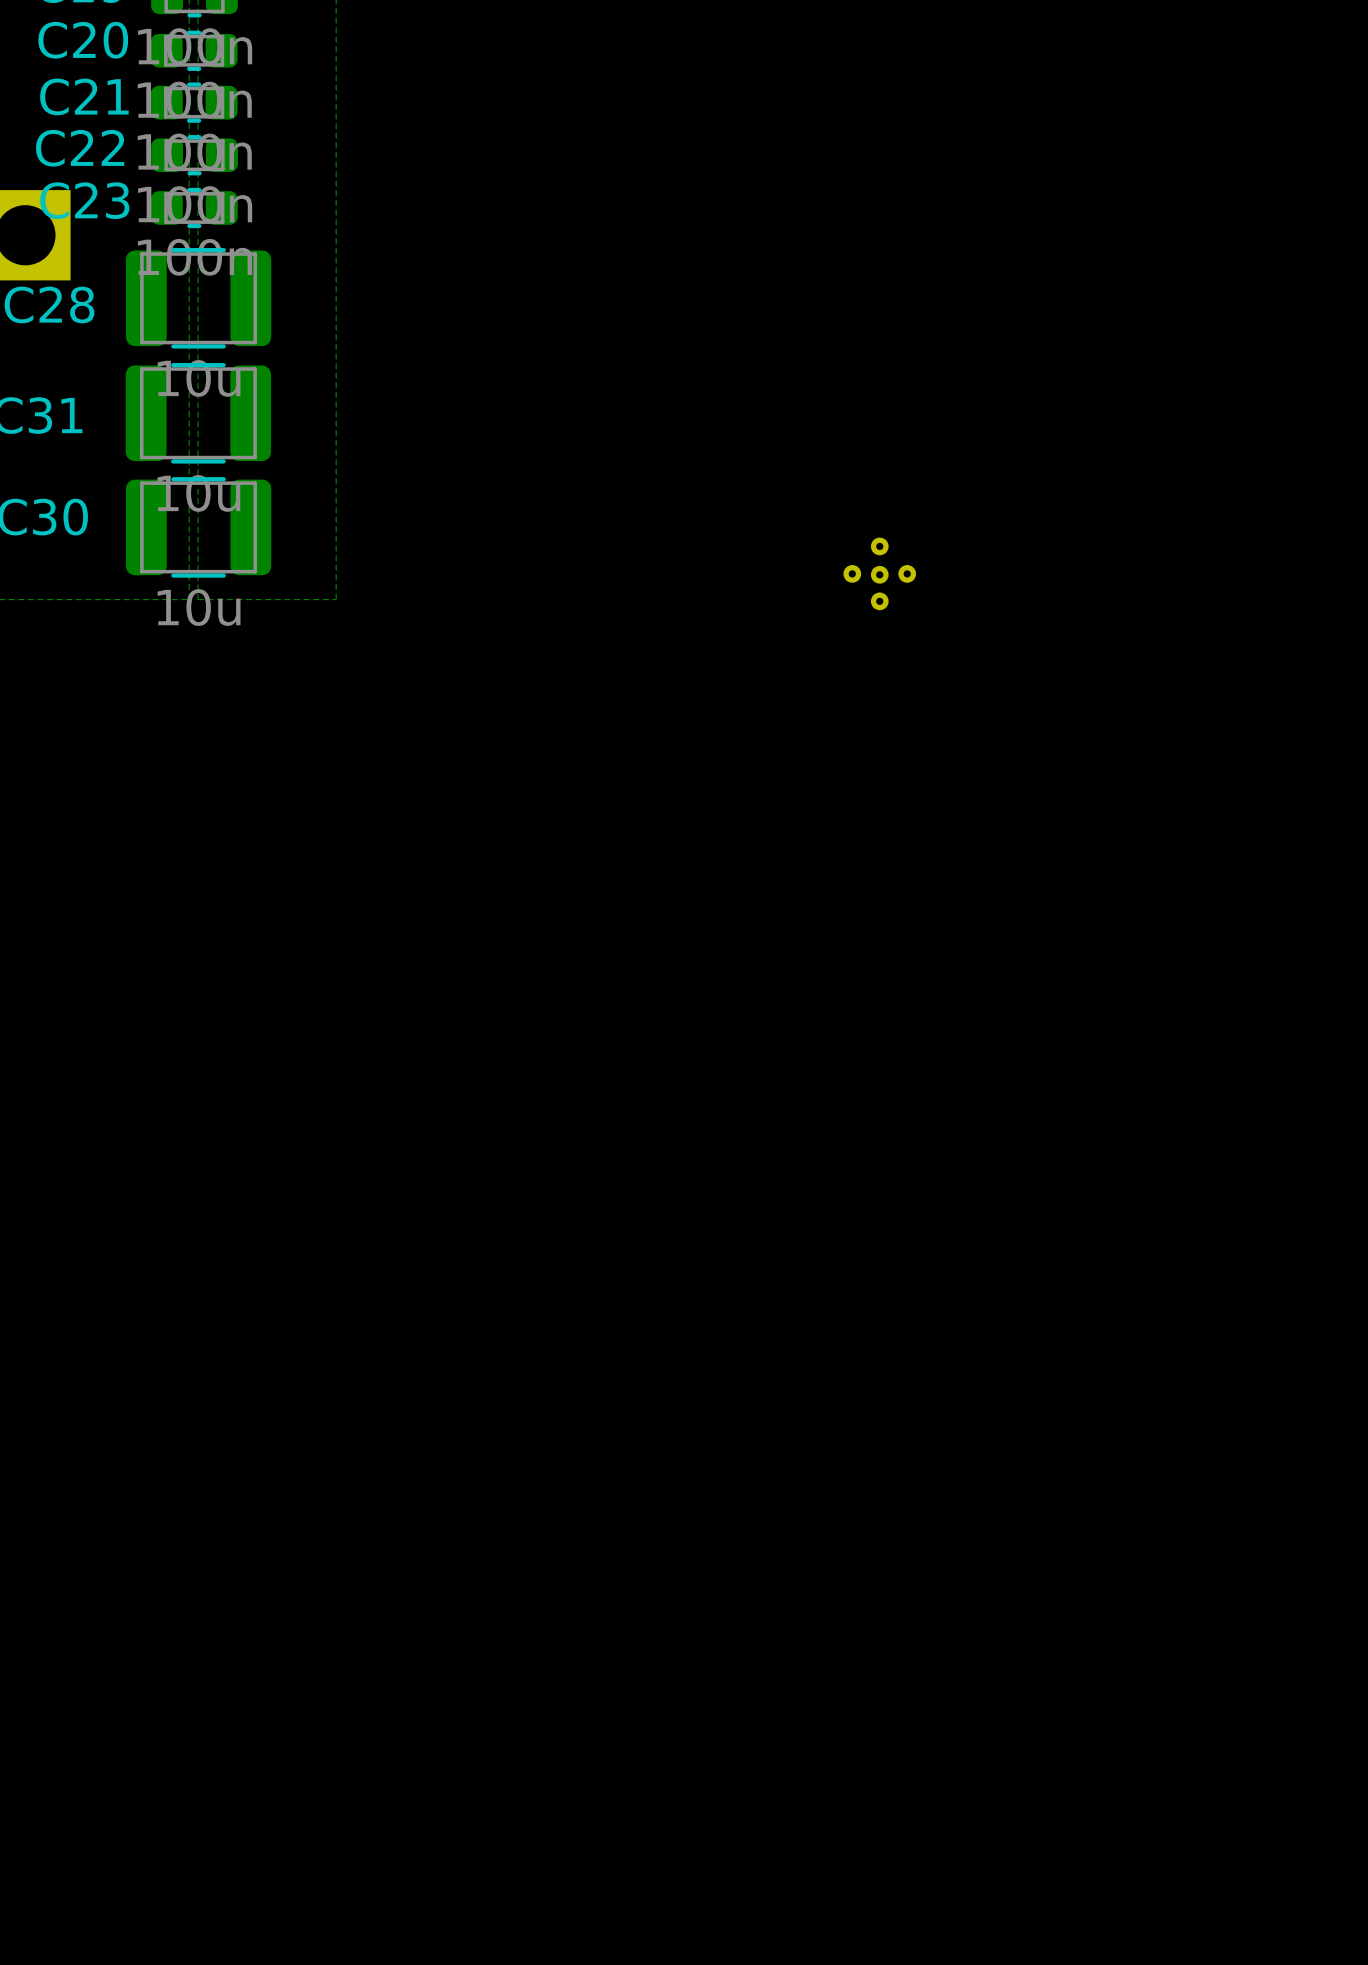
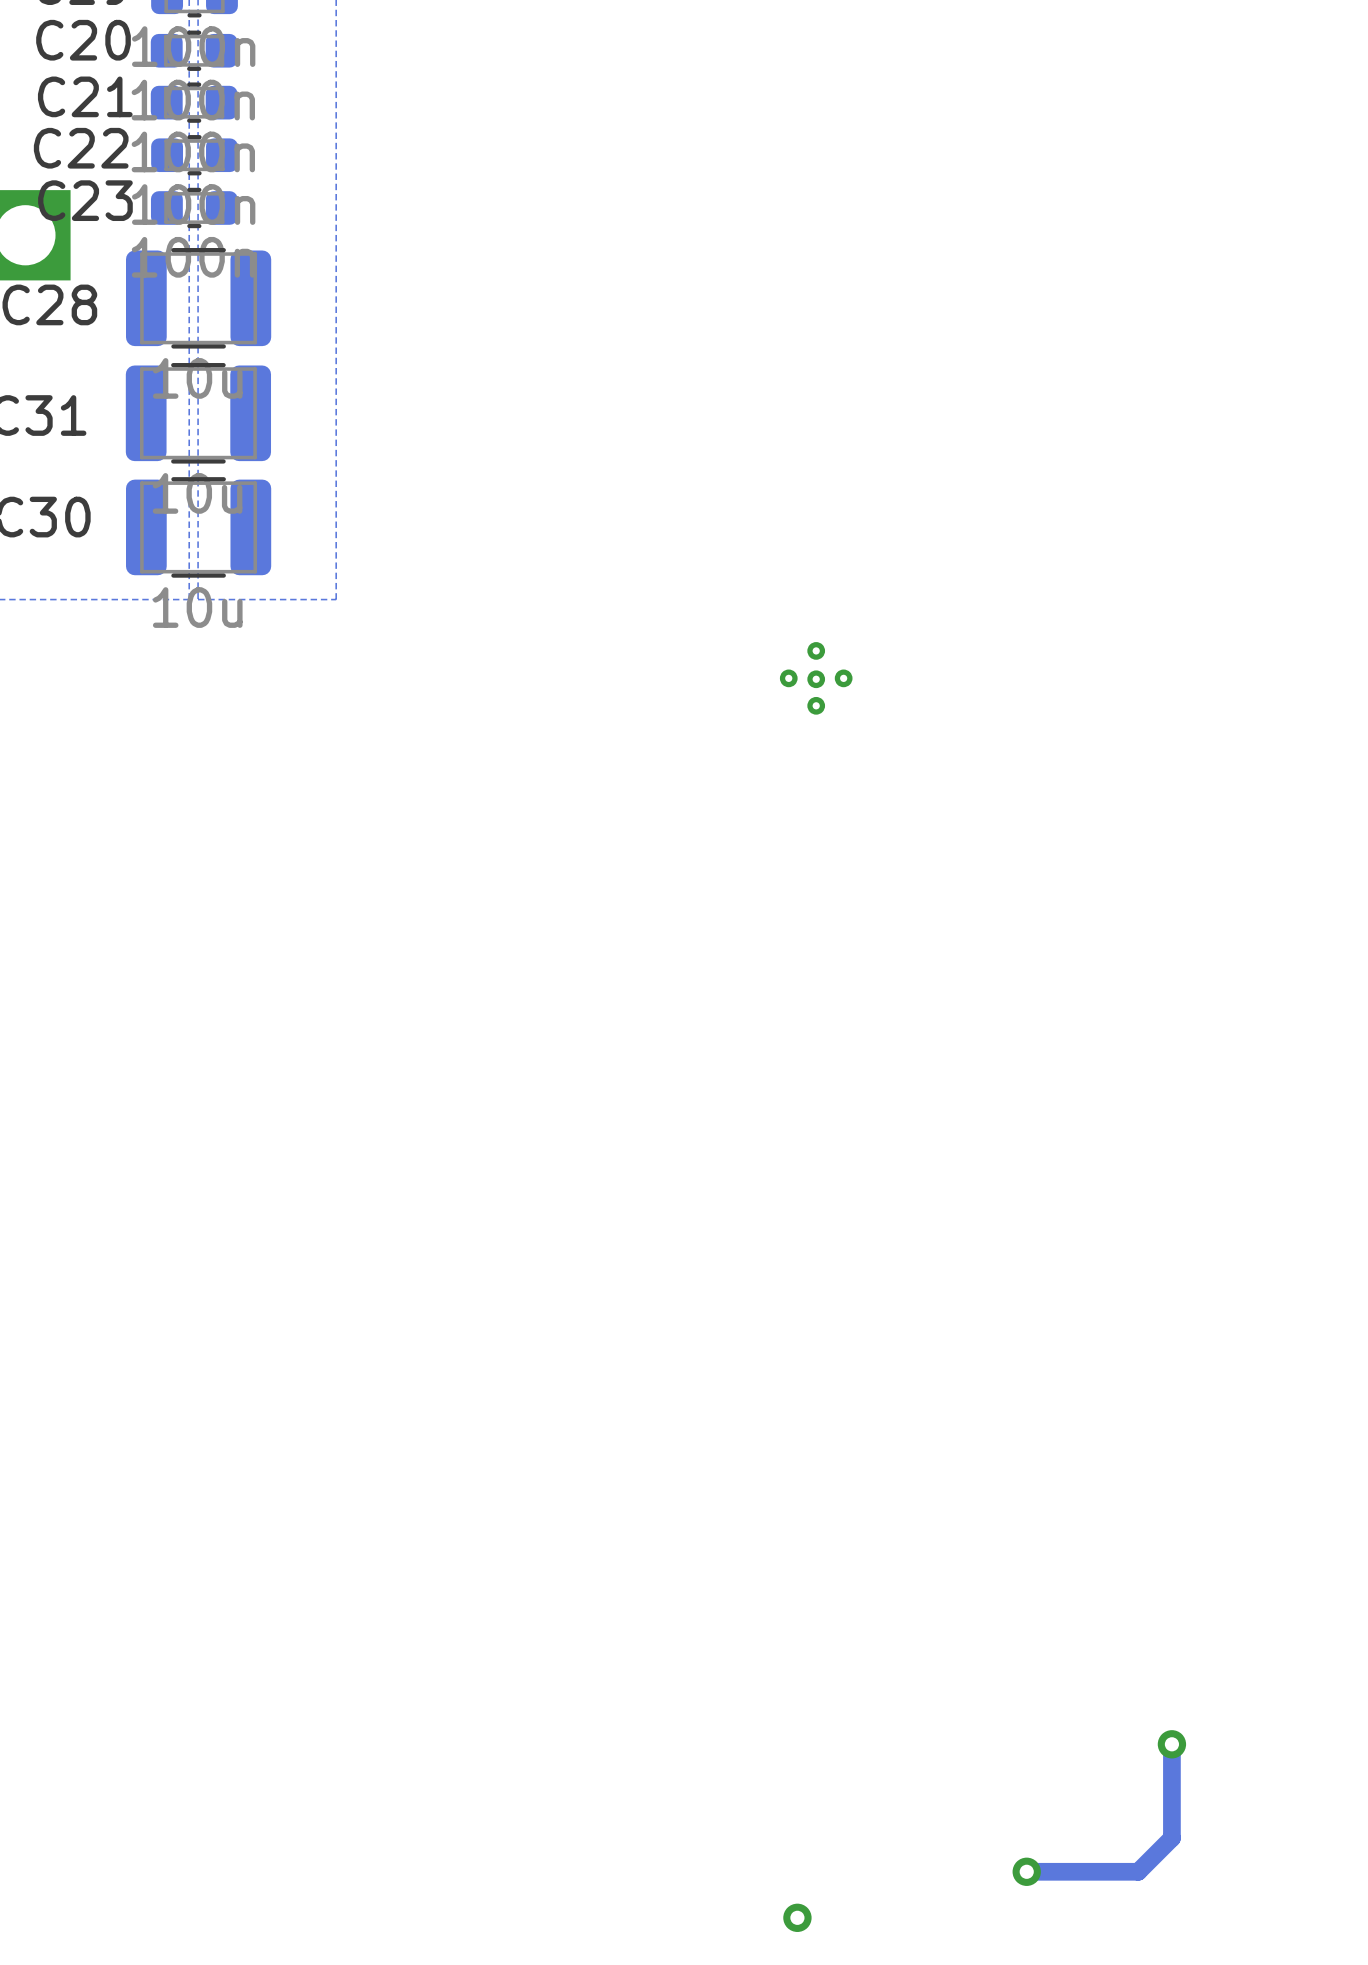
part position: (879, 573) -> (816, 678)
track: none -> (1171, 1744) (1171, 1838) (1138, 1871) (1026, 1871)
via: none -> (1171, 1744)
via: none -> (1026, 1871)
via: none -> (797, 1917)

